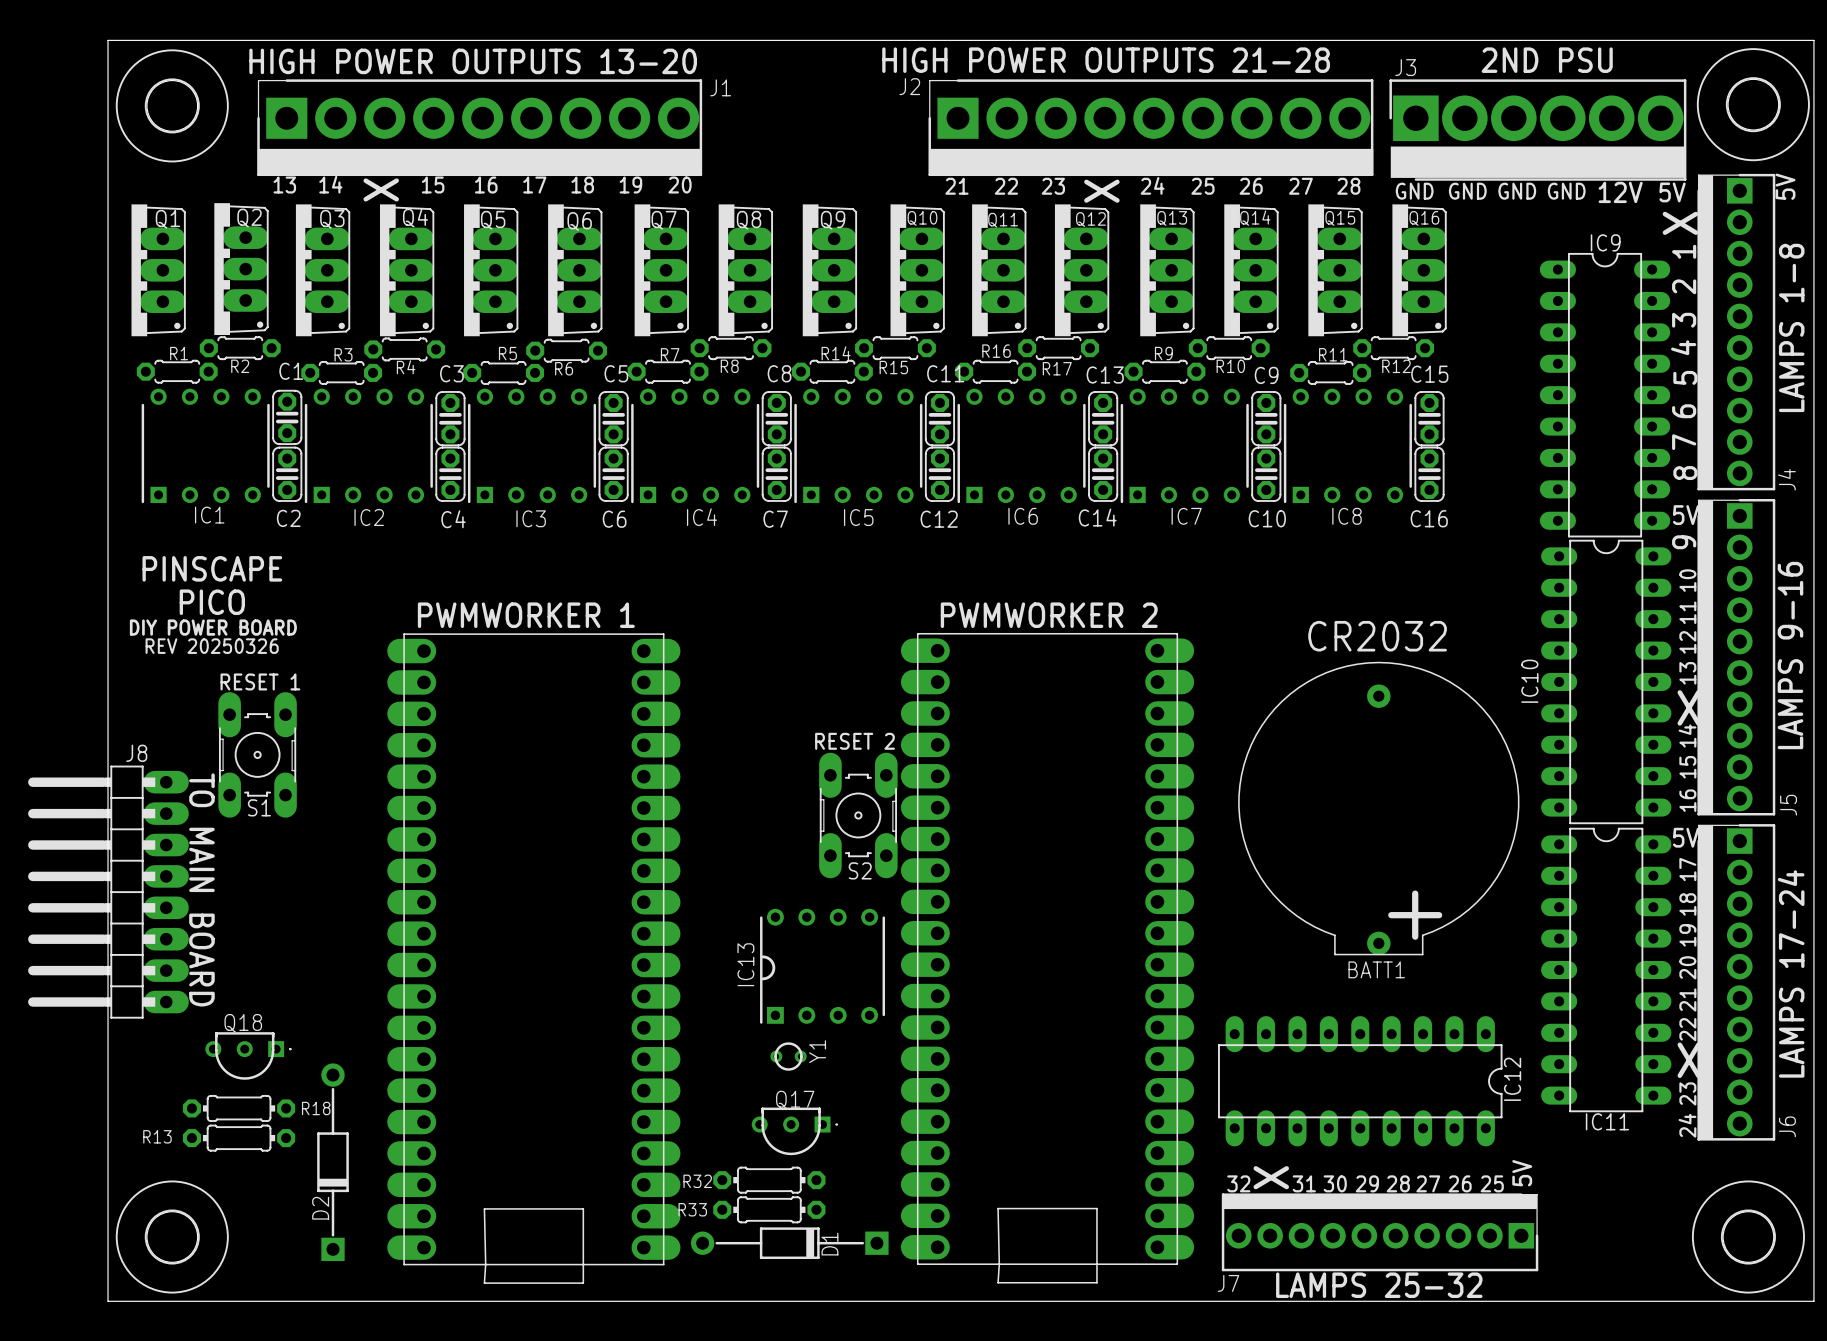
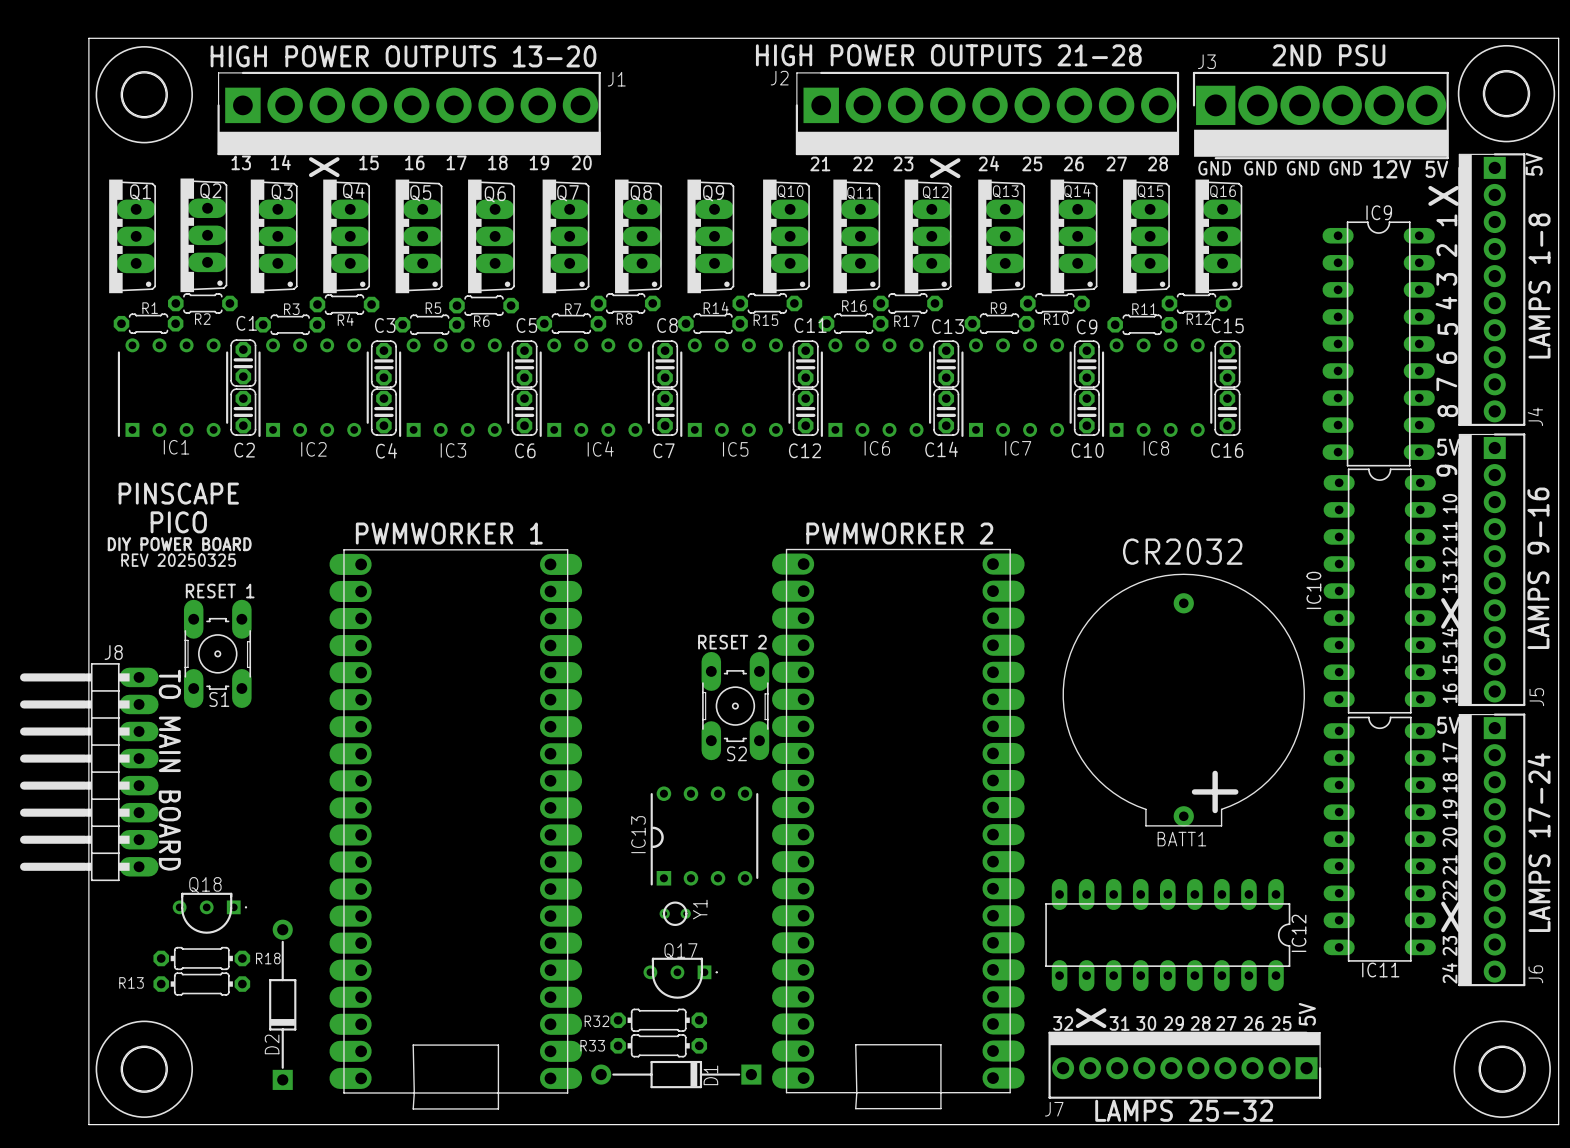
text: REV 20250326 (212, 646) -> REV 20250325 (178, 560)

